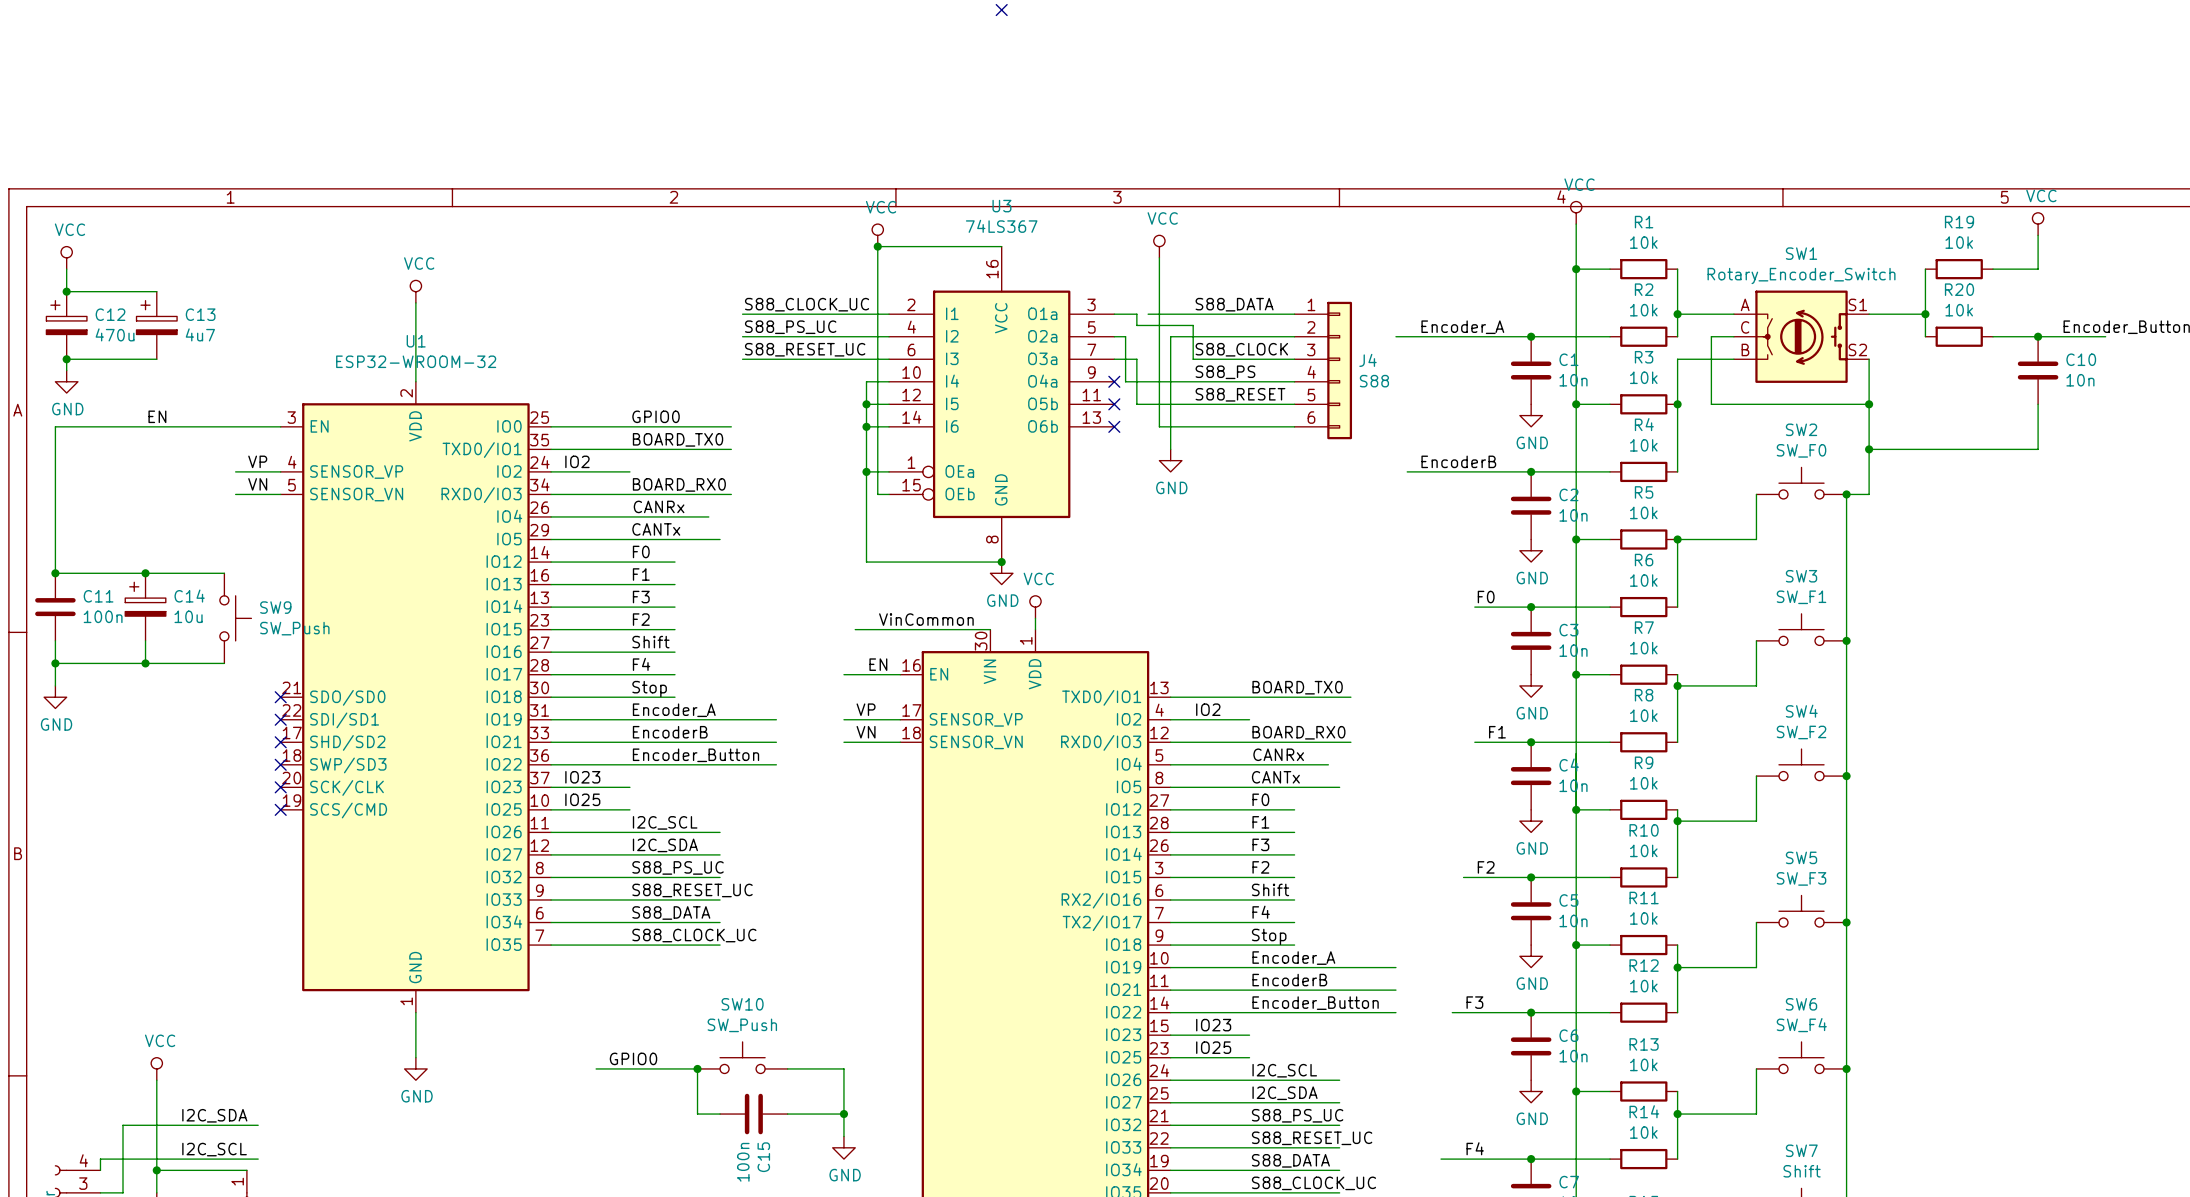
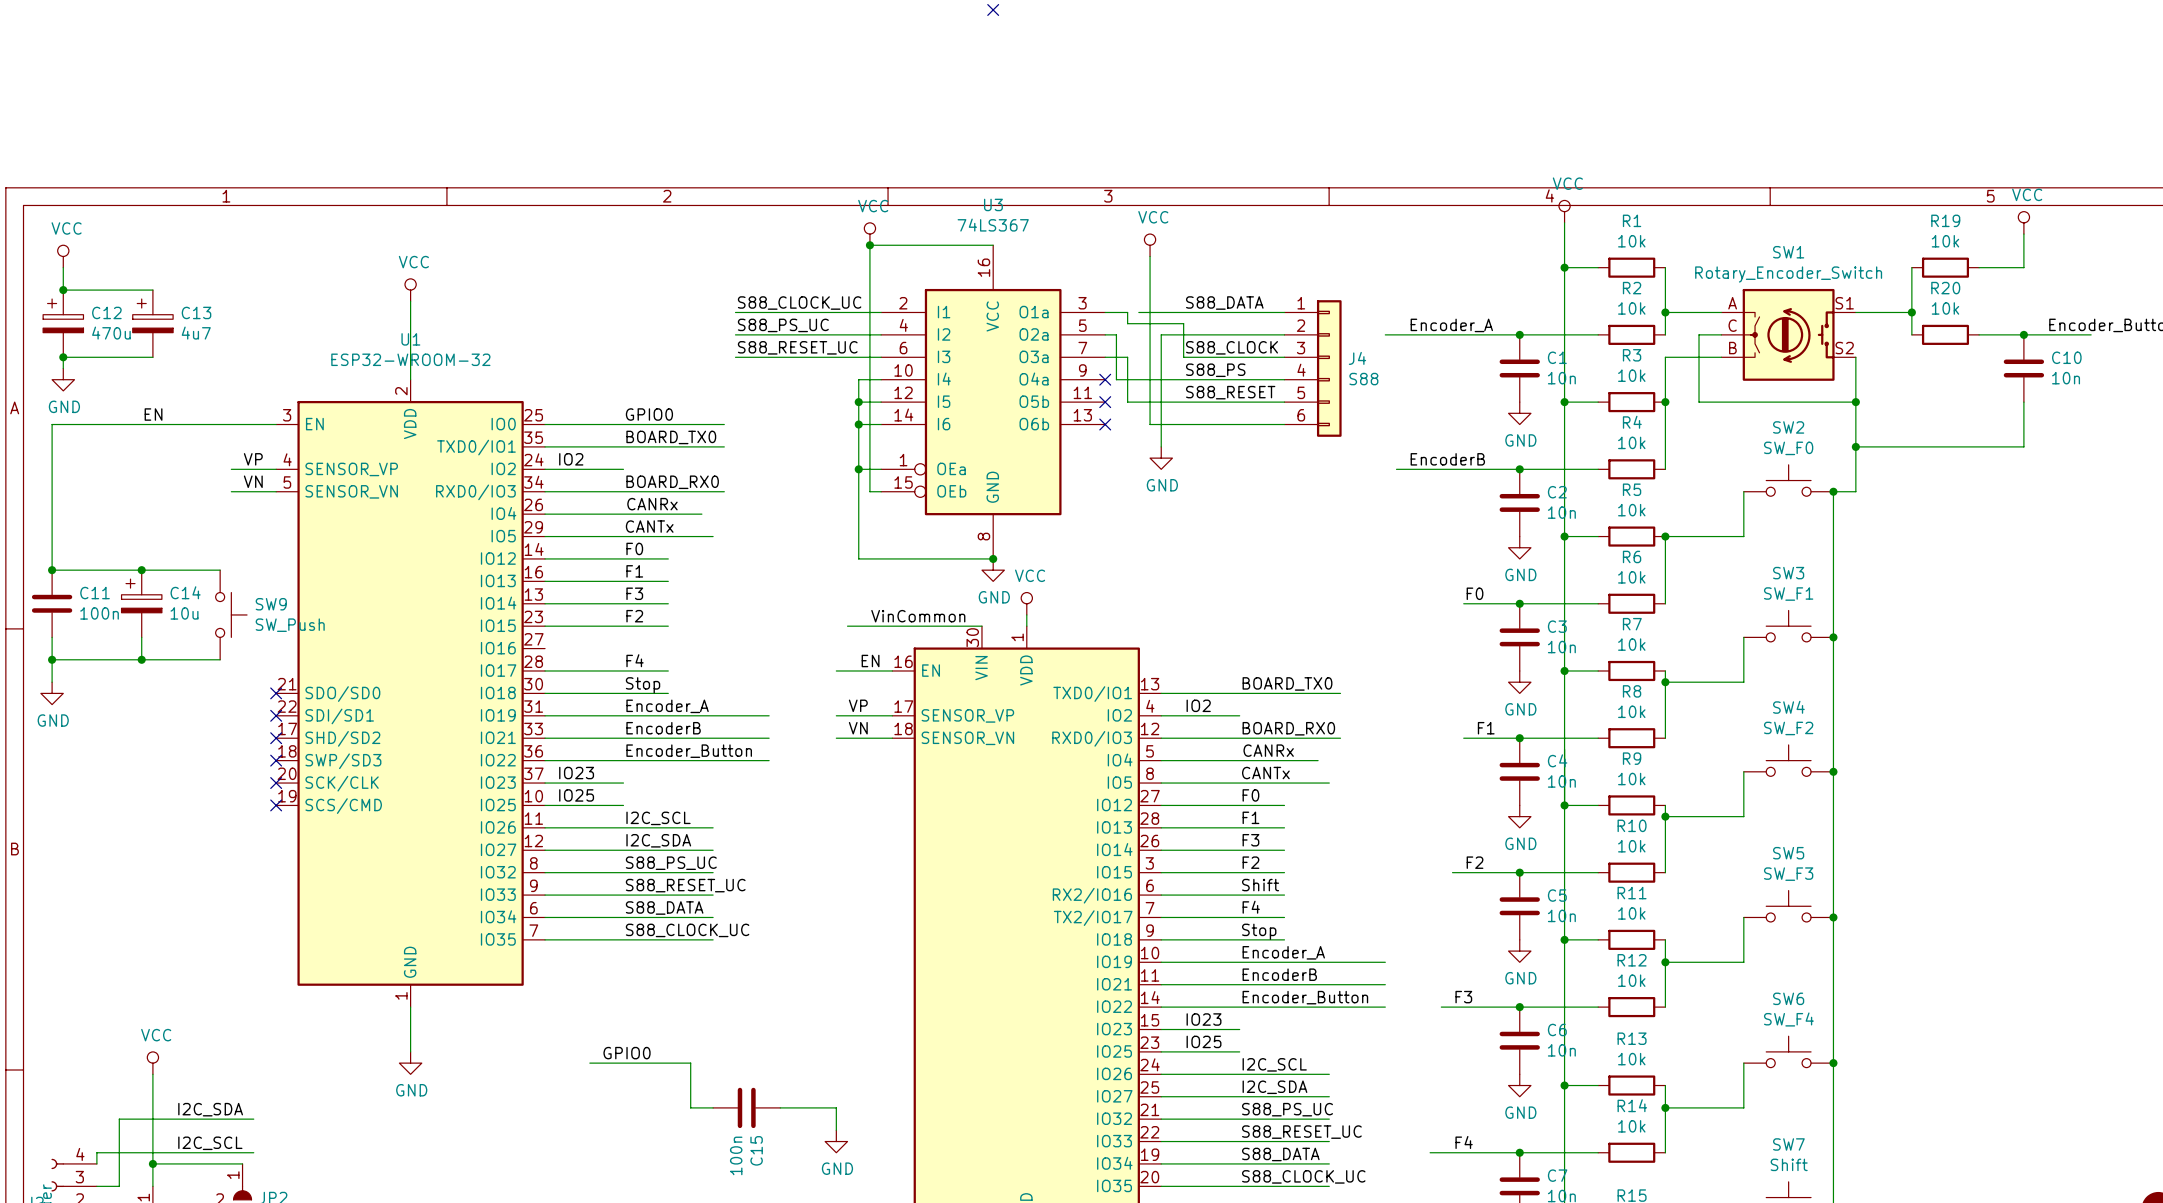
label: Shift (650, 642) -> none
wire: (551, 652) (674, 652) -> none
SW10: SW_Push (742, 1057) -> none
junction: (697, 1068) -> none
wire: (787, 1068) (843, 1068) (843, 1114) -> none
junction: (843, 1114) -> none

